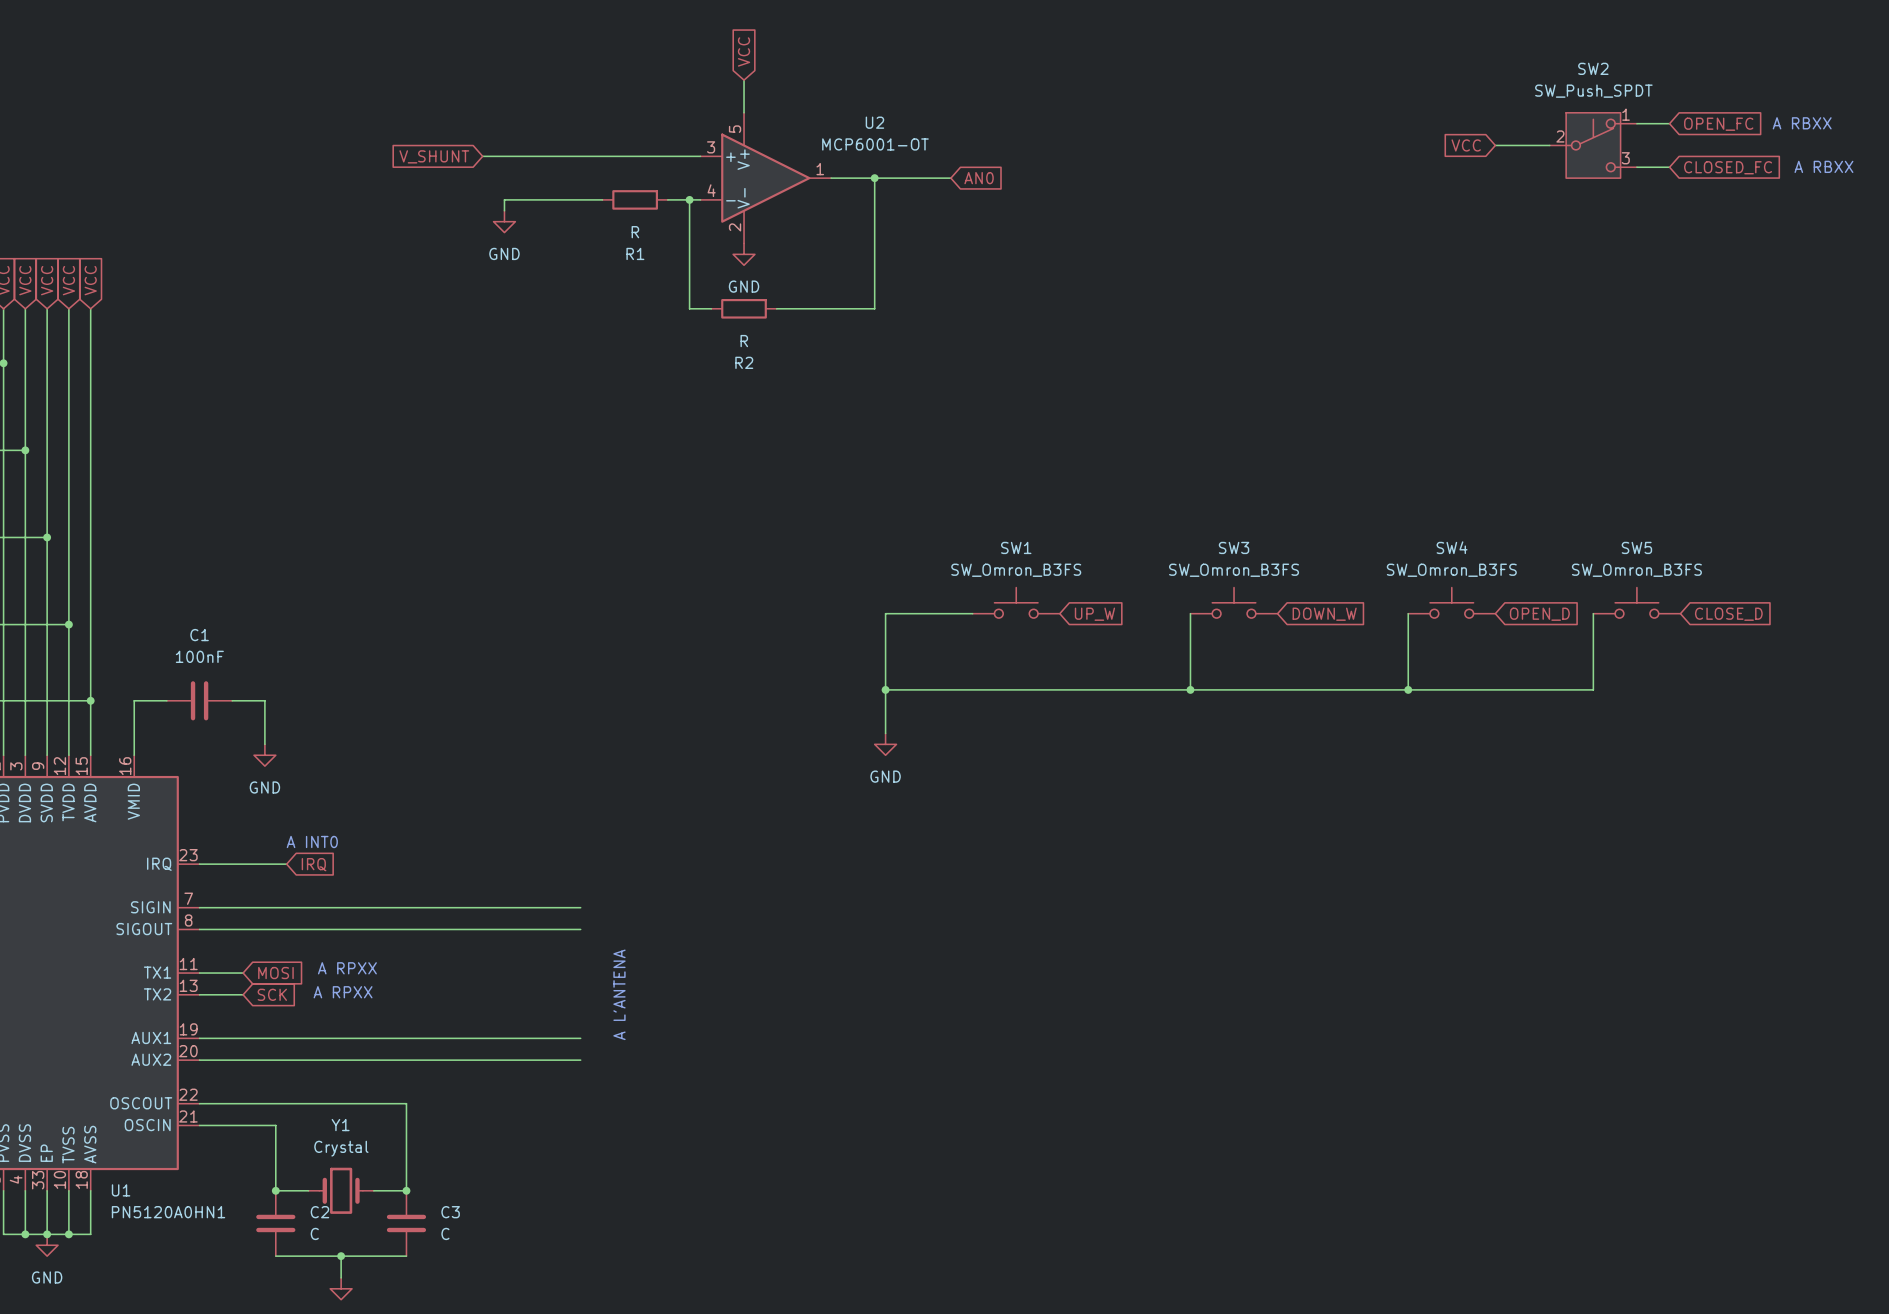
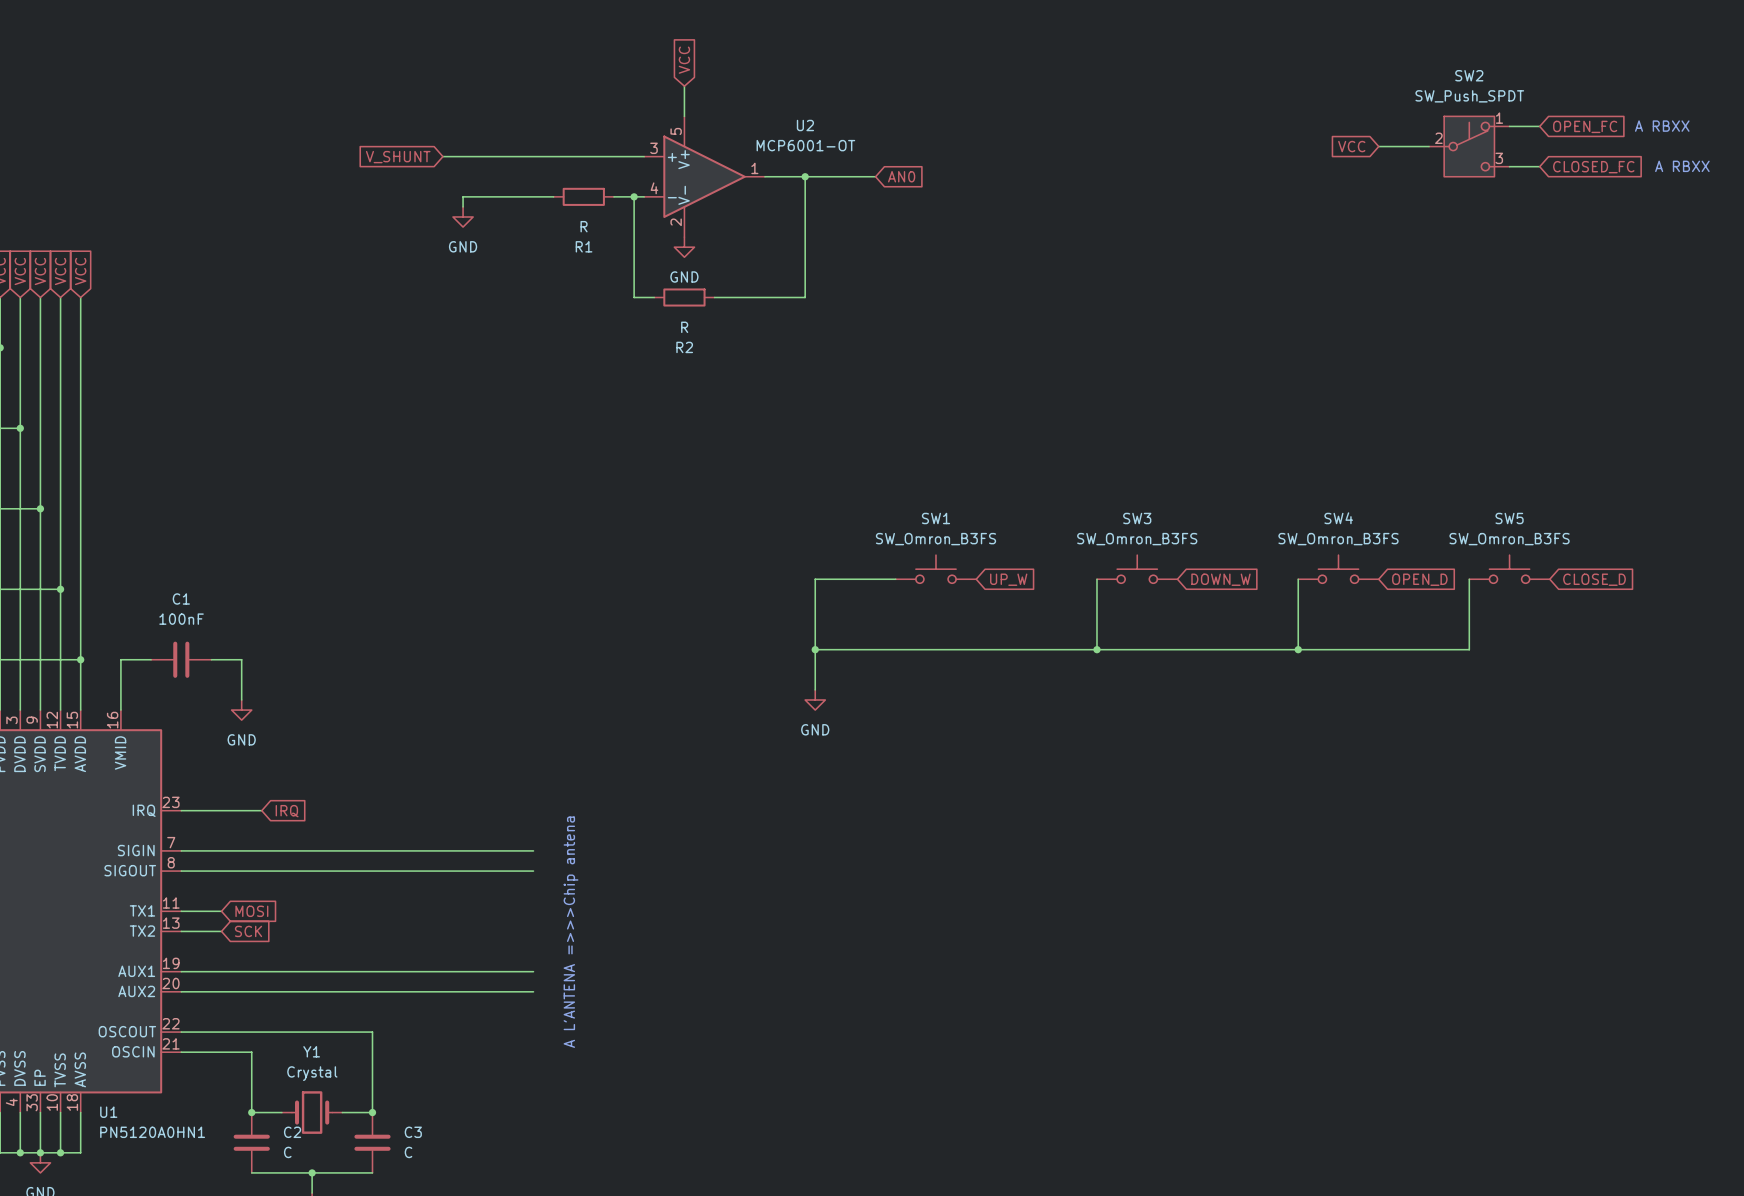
text: A INT0 (312, 841) -> none
text: A RPXX (347, 968) -> none
text: A RPXX (343, 992) -> none
text: A L'ANTENA (619, 994) -> A L'ANTENA =>>>Chip antena (571, 932)

